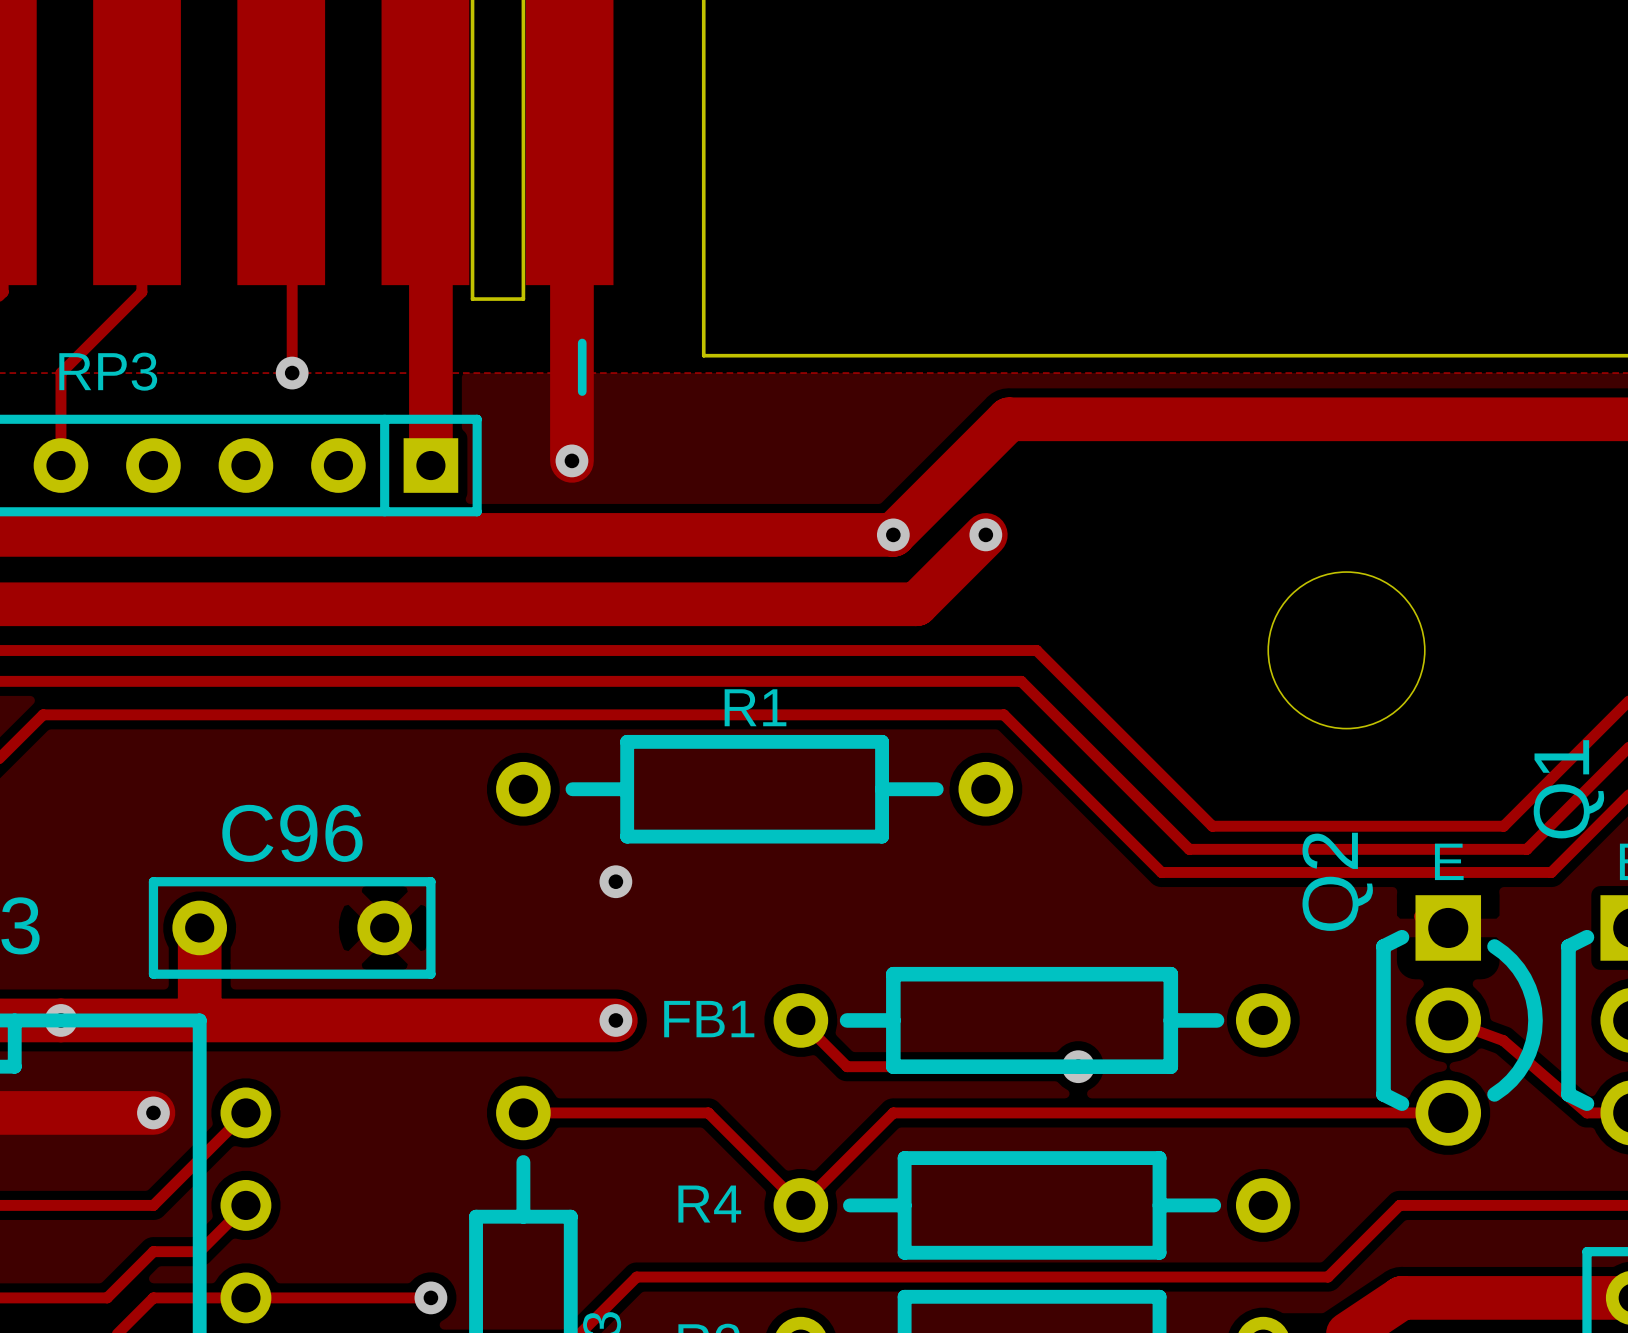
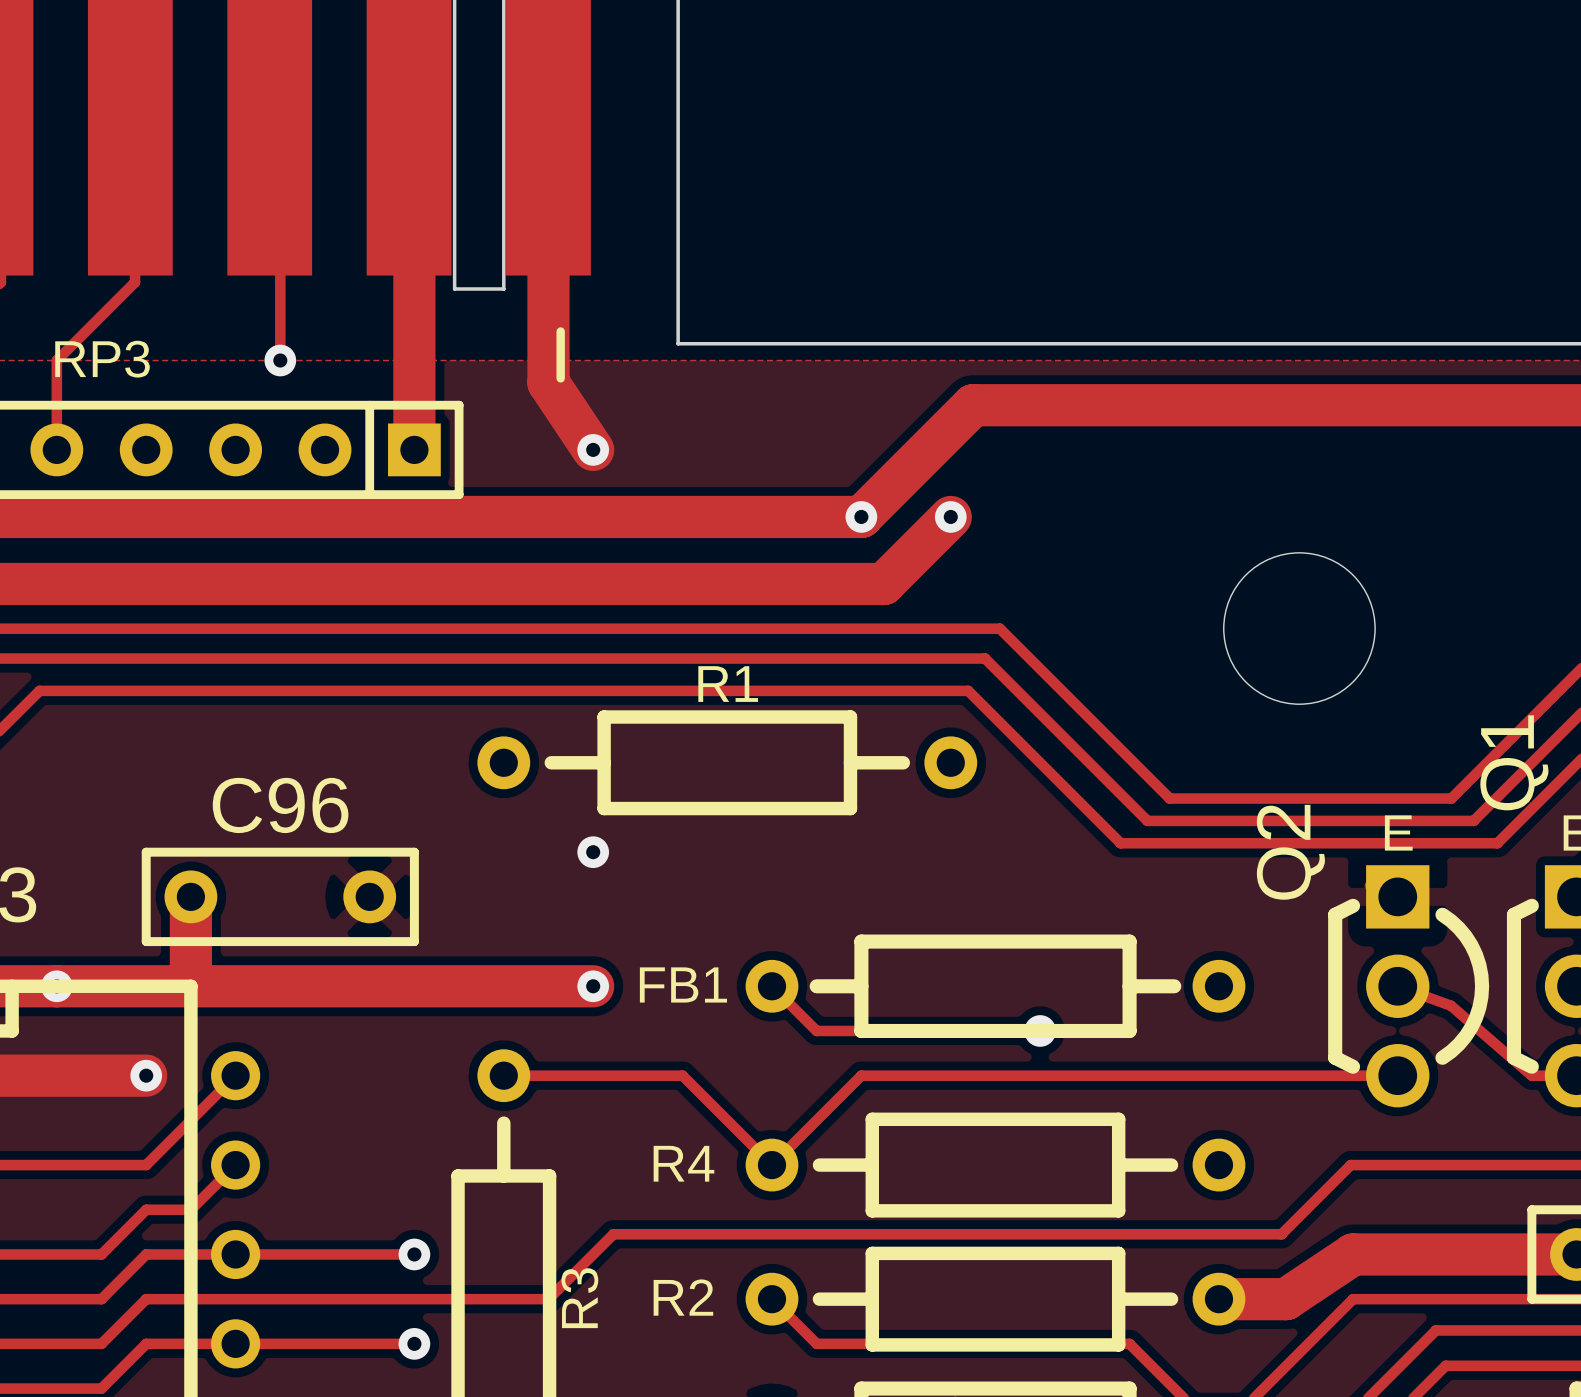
track: none -> (548, 107) (548, 382) (593, 449)
track: (569, 125) (571, 127) (571, 460) -> none
via position: (571, 460) -> (593, 449)

